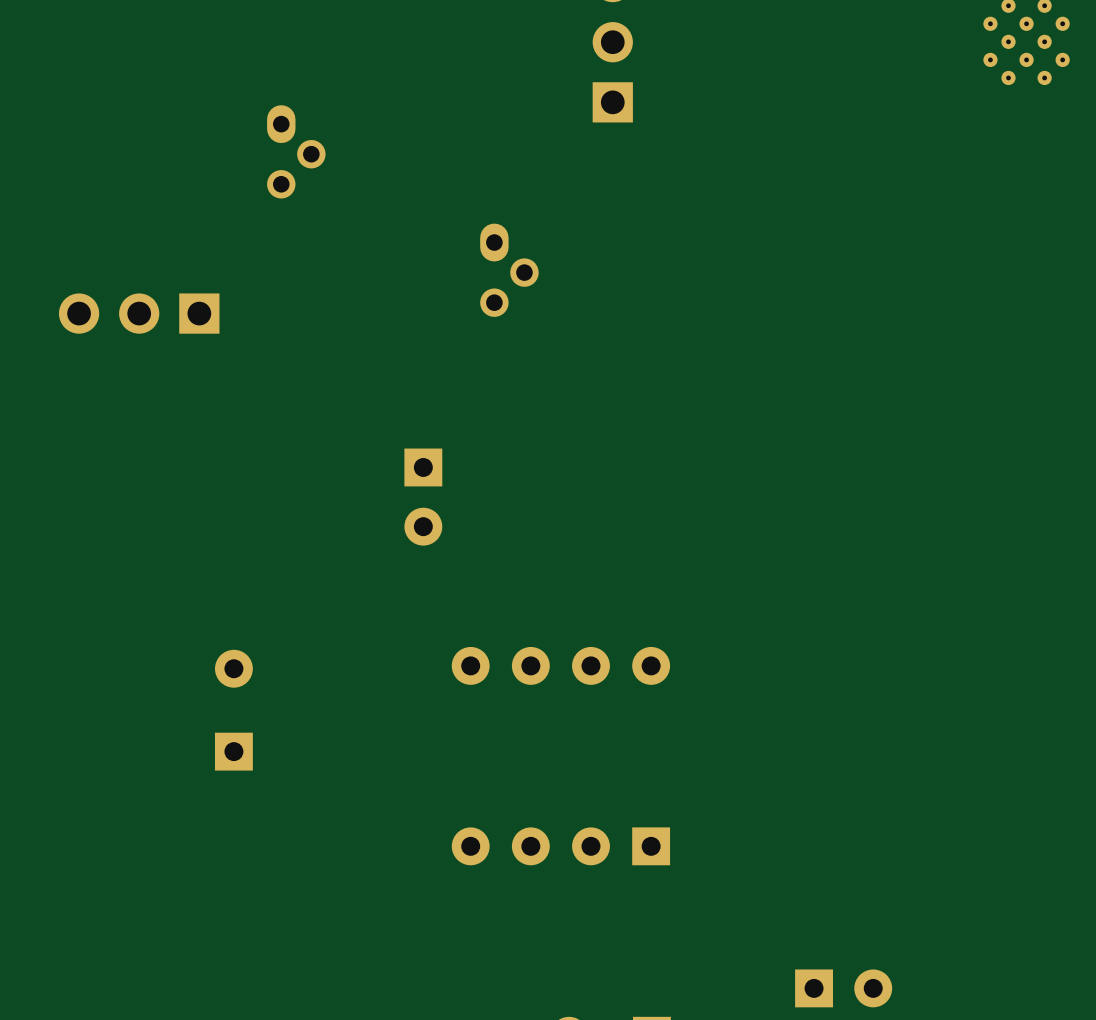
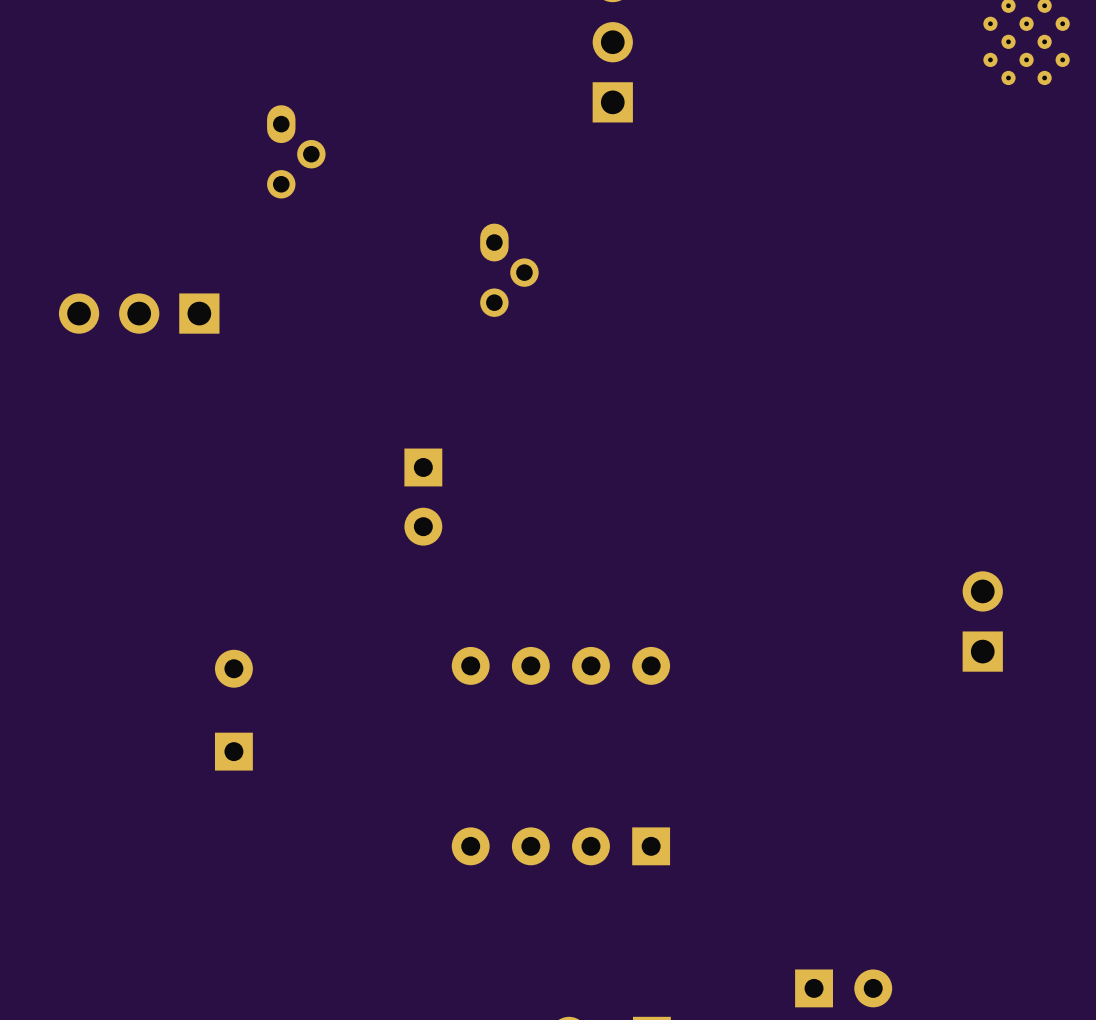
part: none -> (982, 621)

